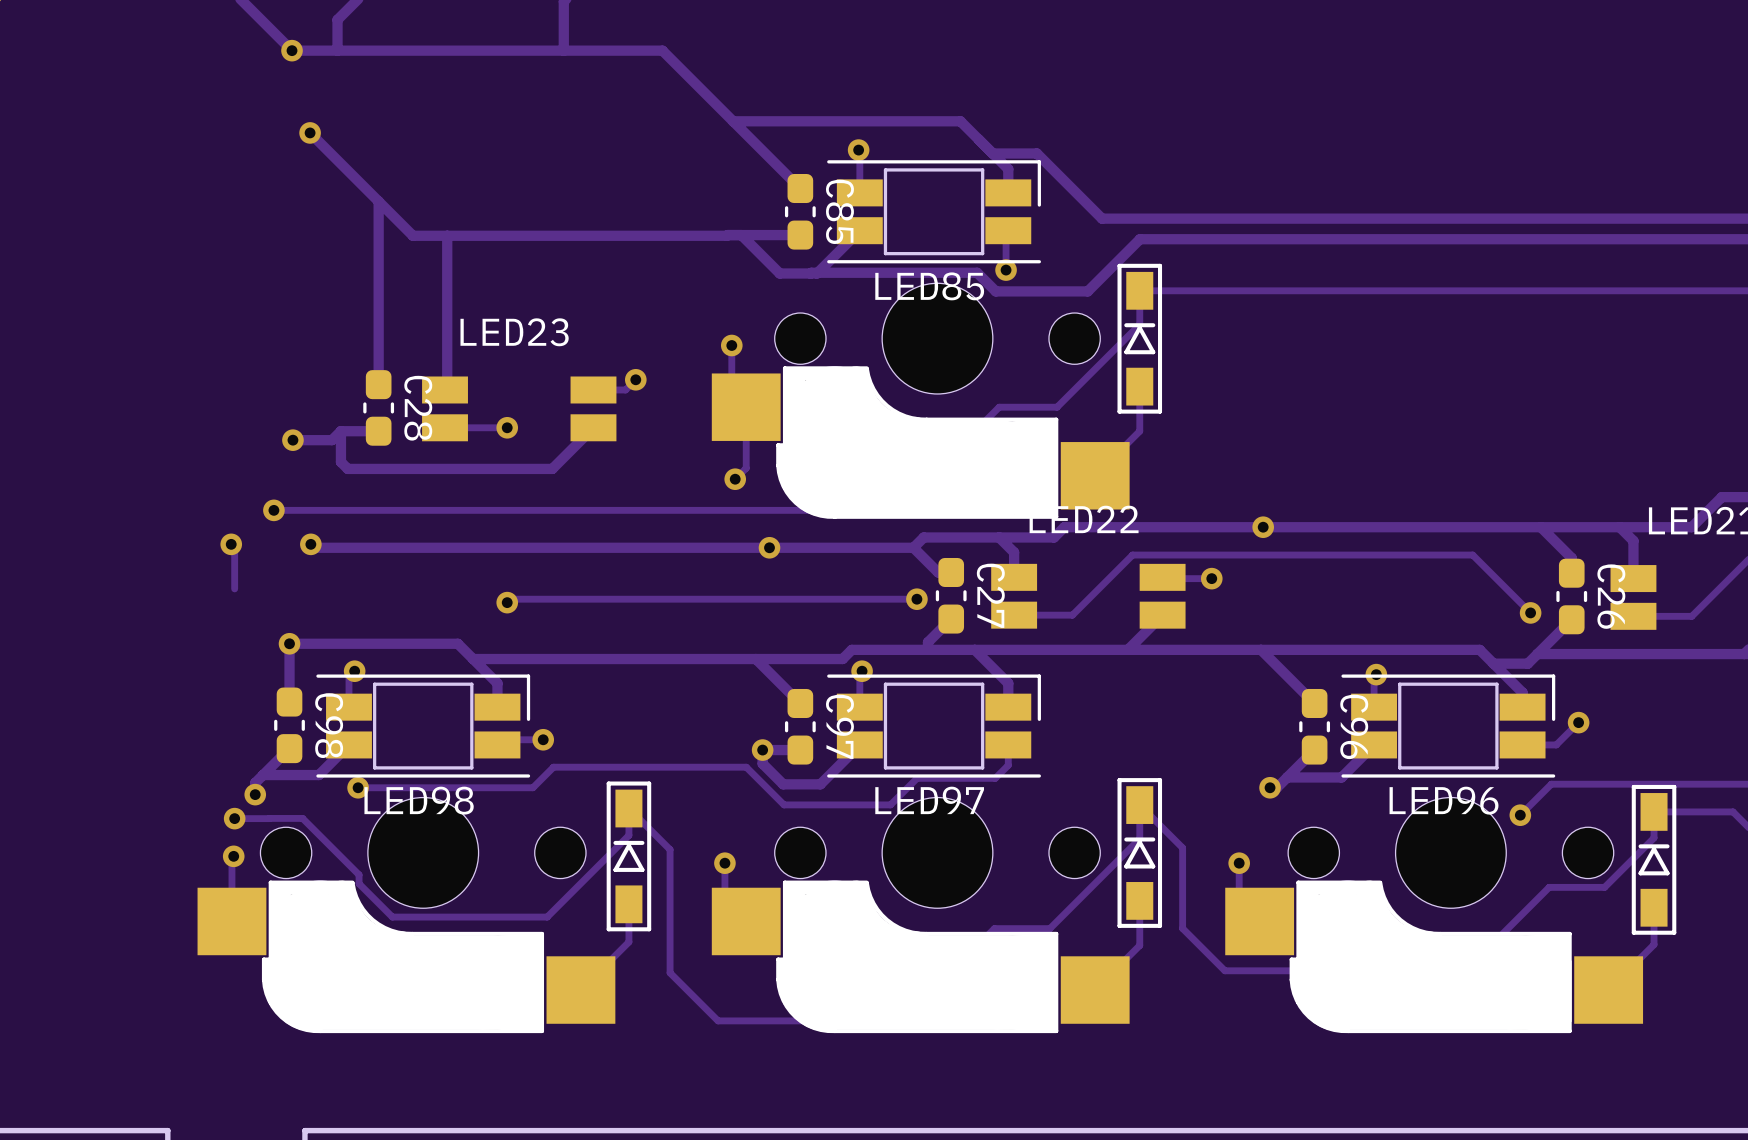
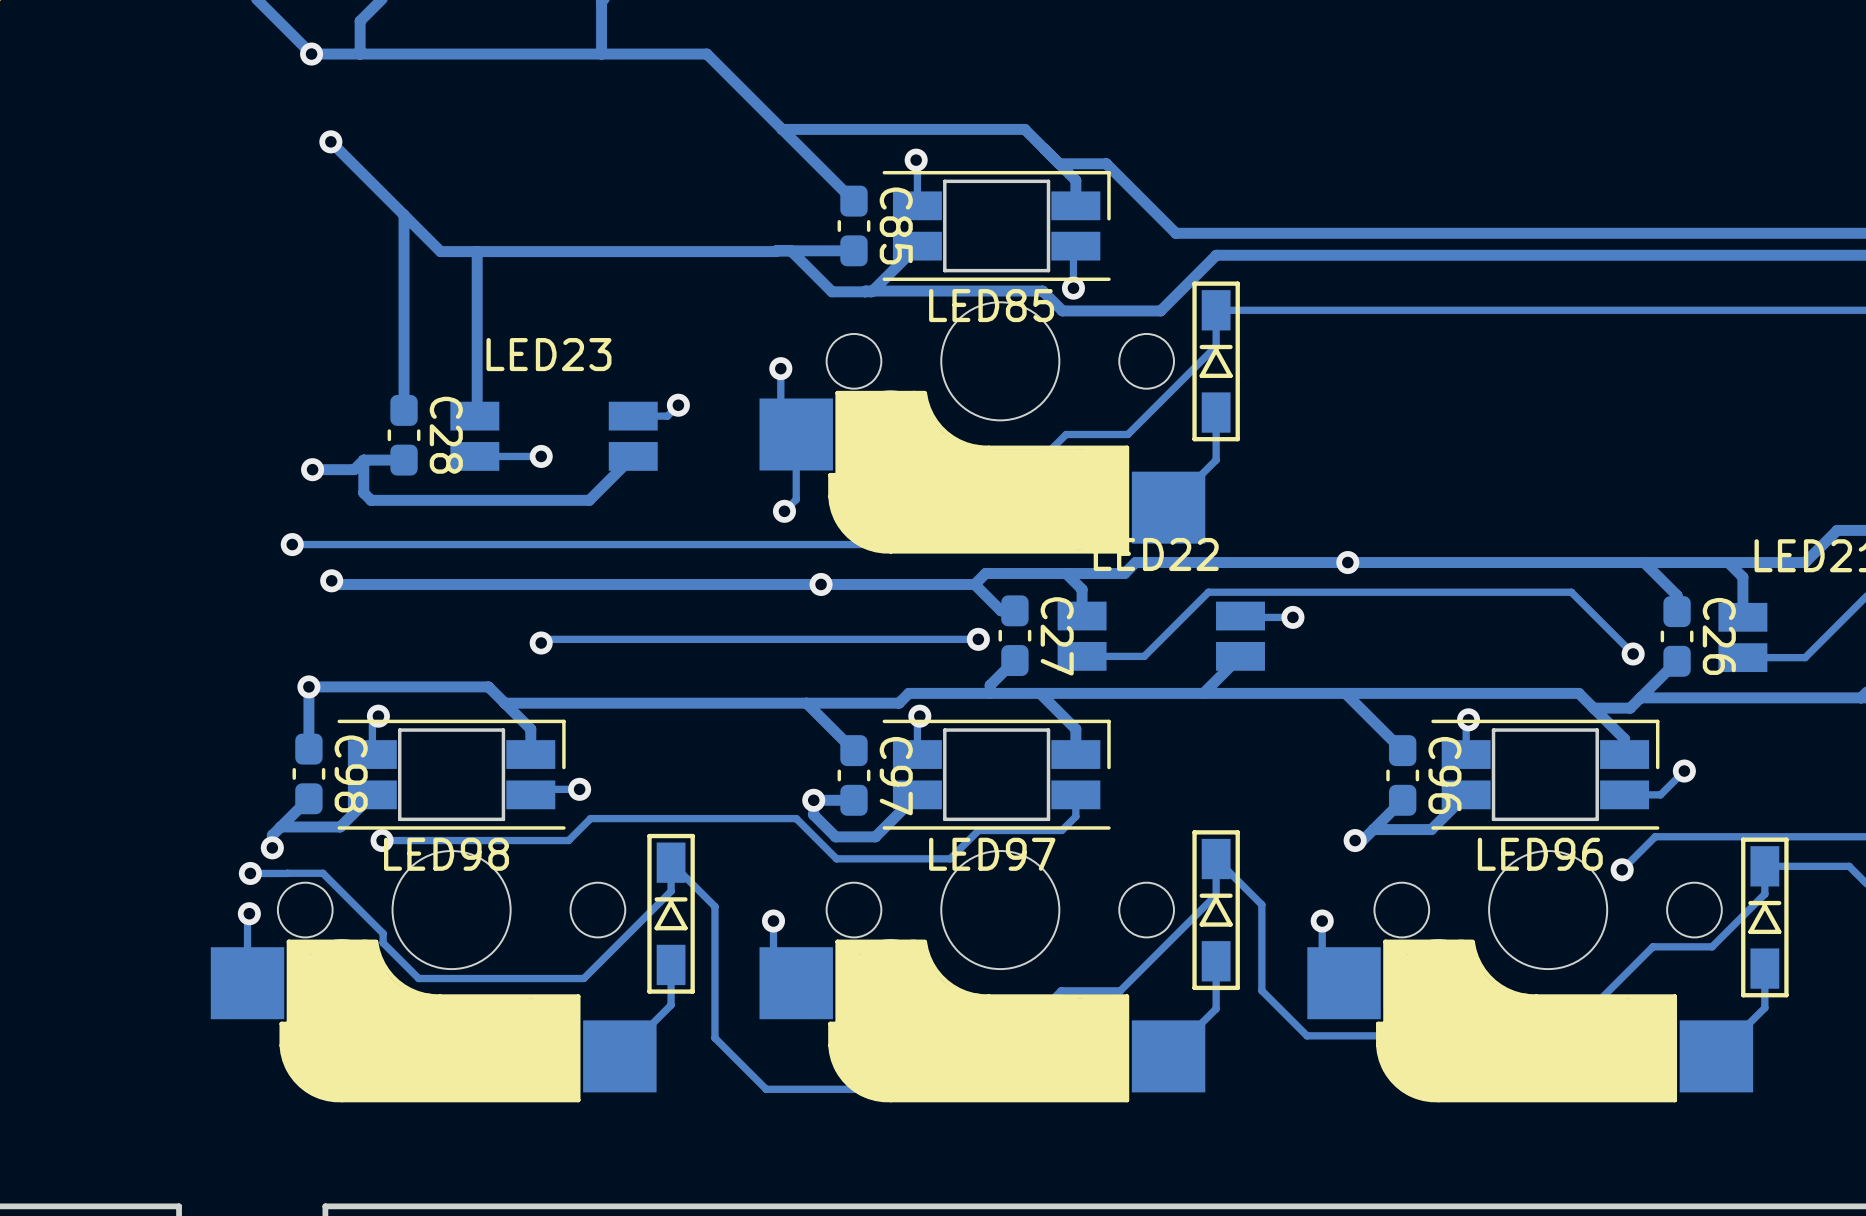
track: (231, 544) (234, 547) (234, 588) -> none
via: (231, 544) -> none

